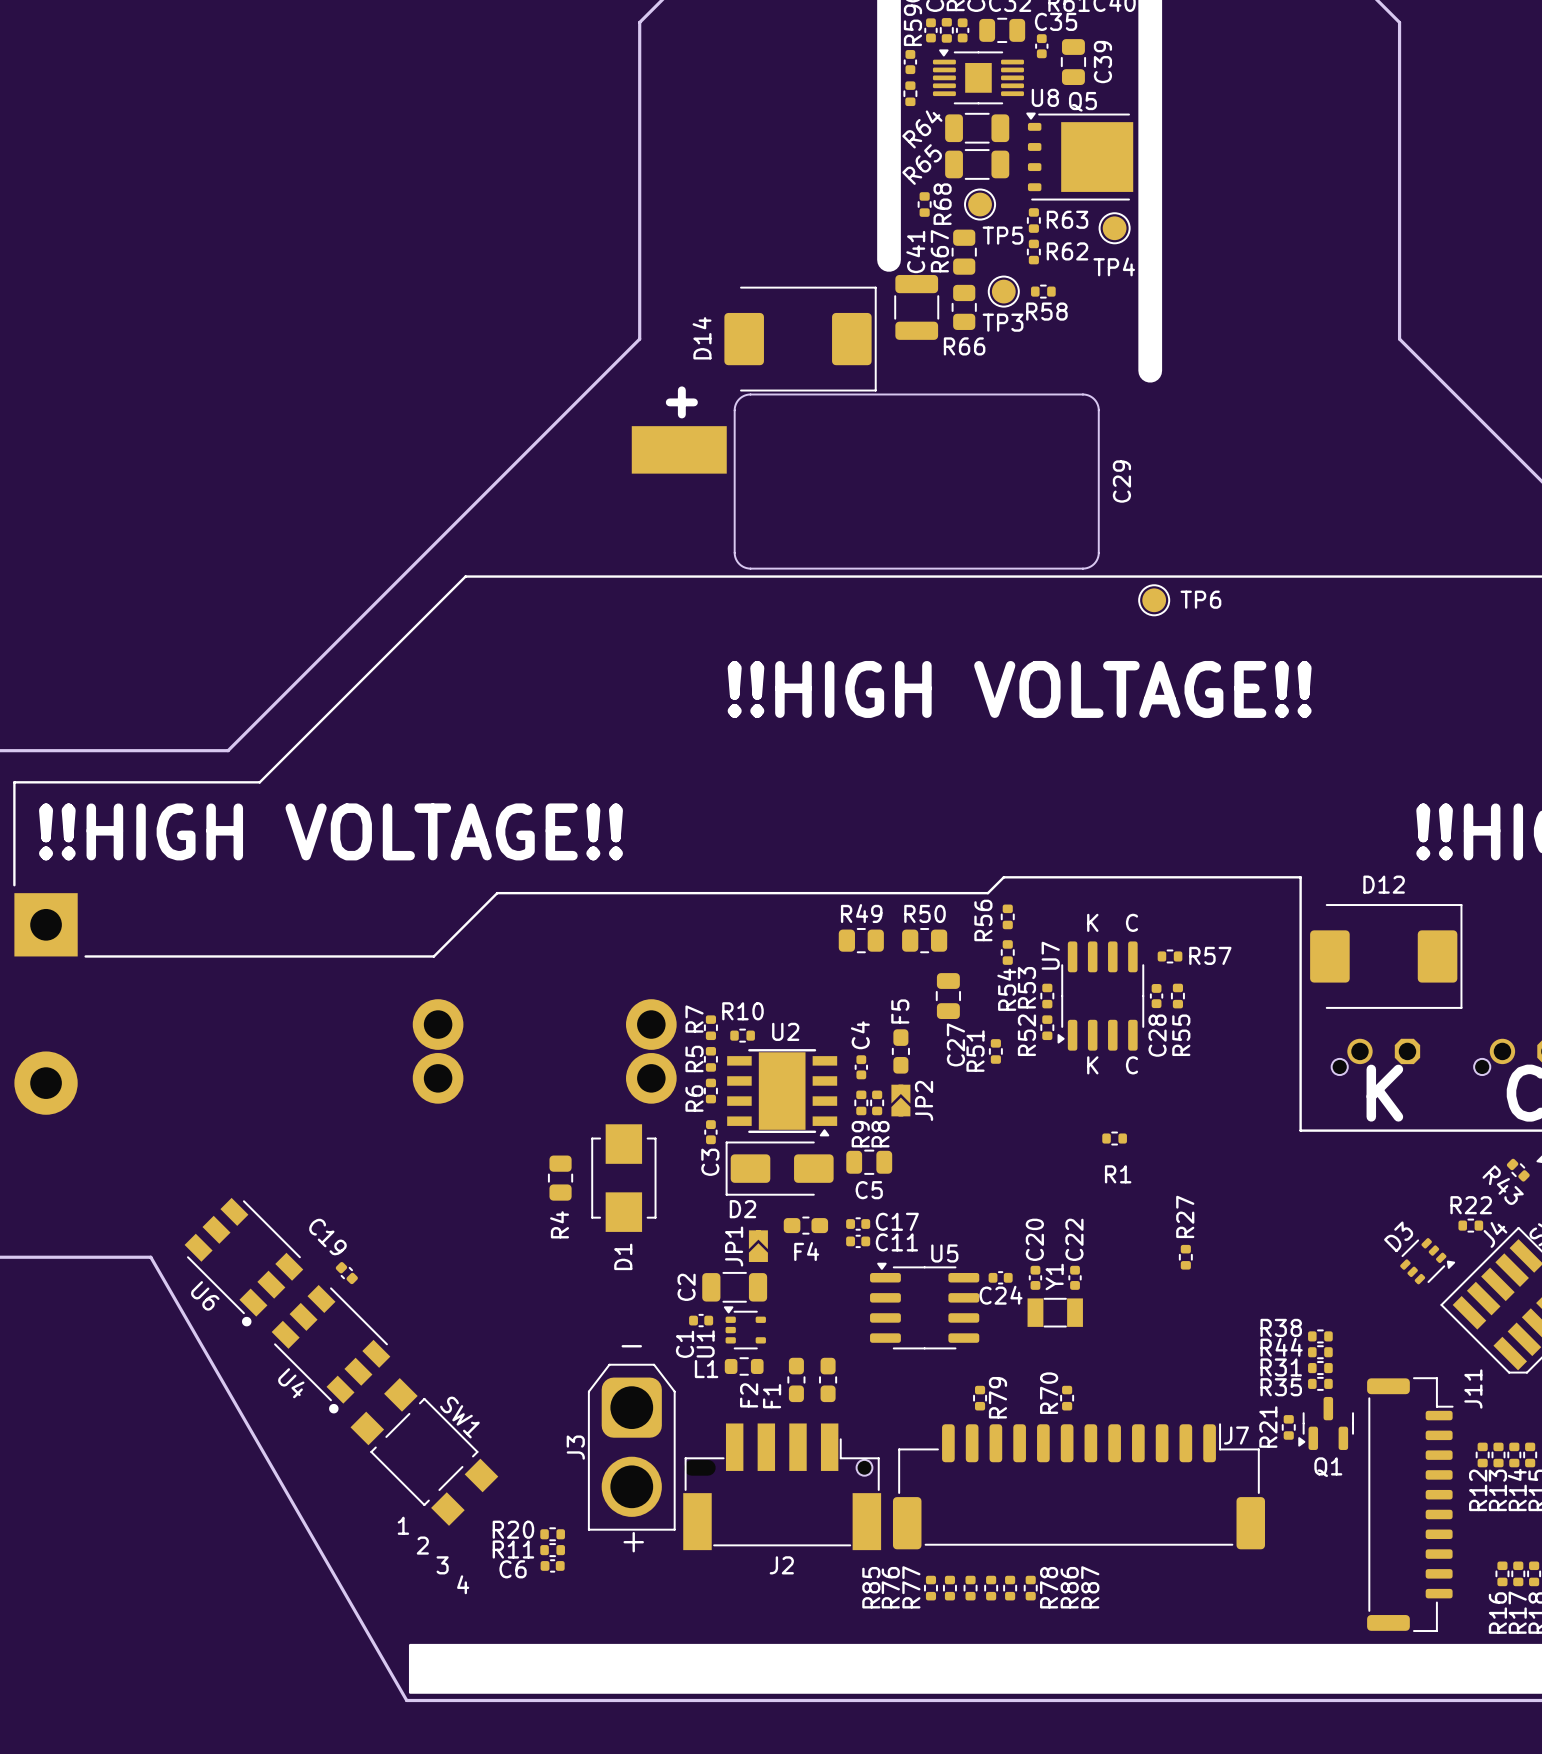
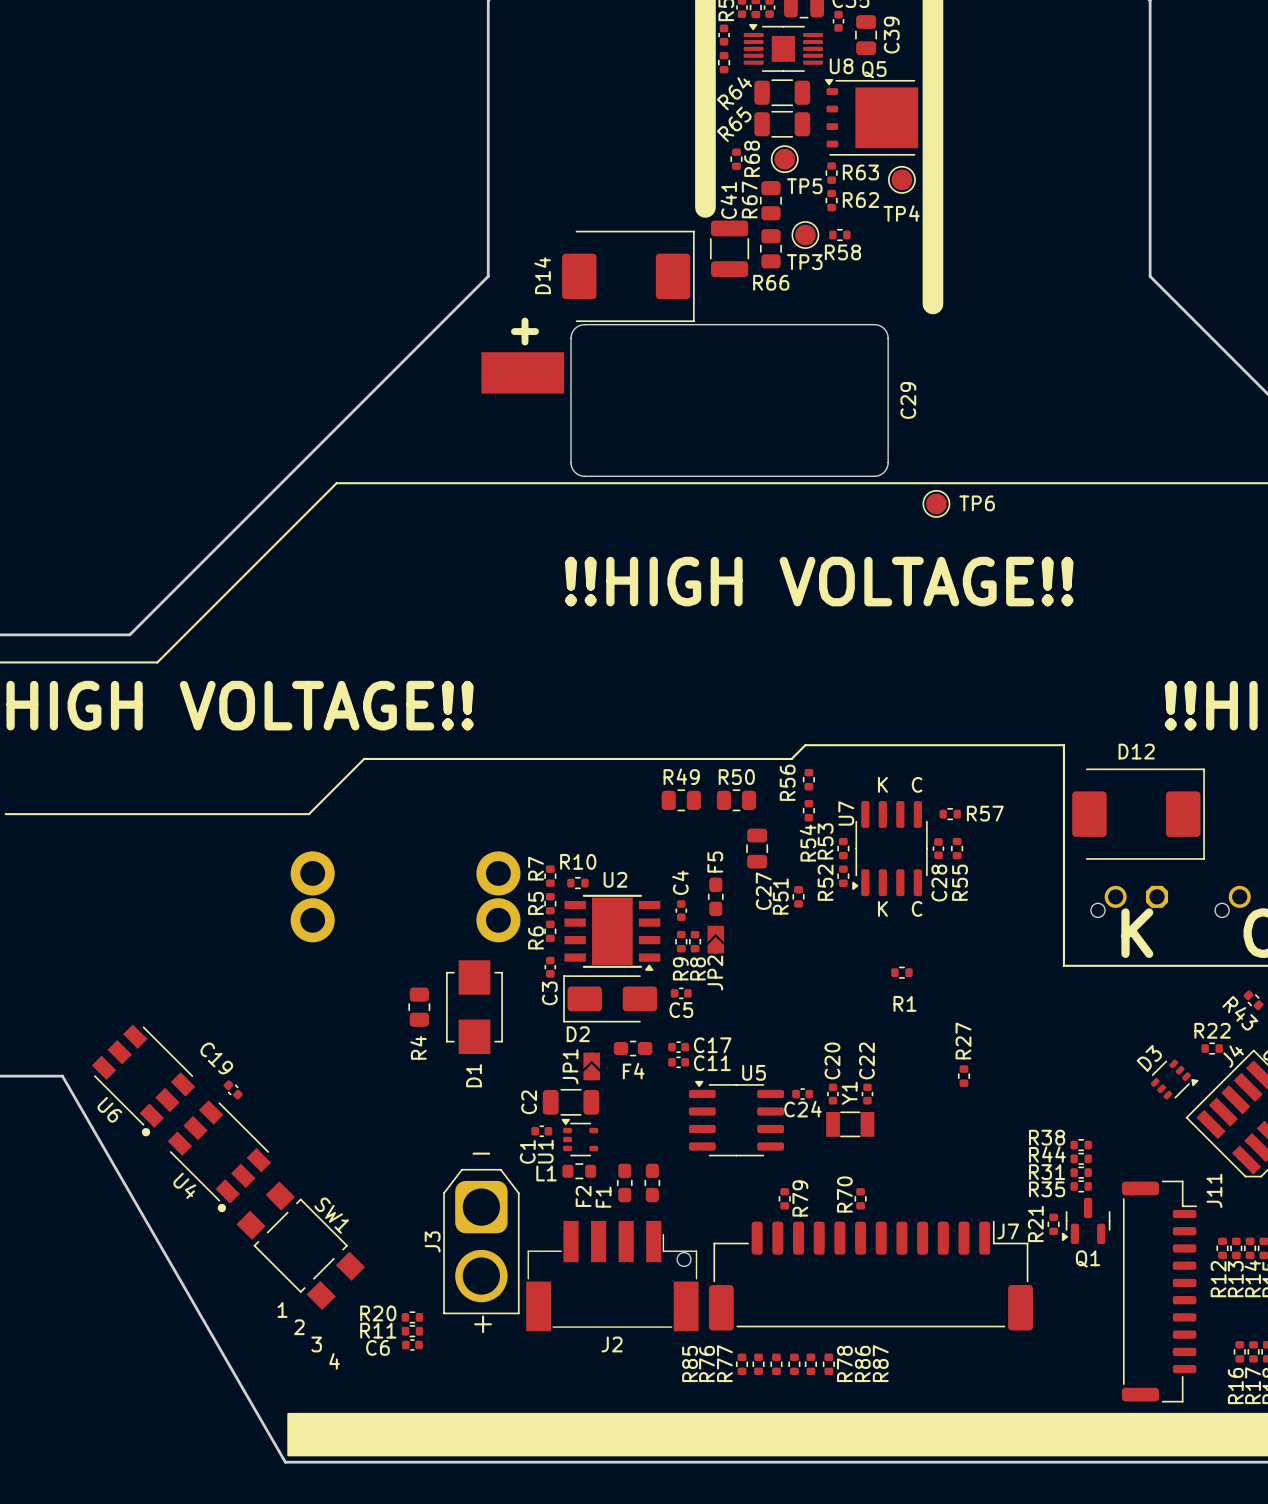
JP2 name position: JP2 (924, 1100) -> JP2 (715, 973)
C5 footprint: [846, 1149, 893, 1175] -> [670, 987, 692, 1000]

